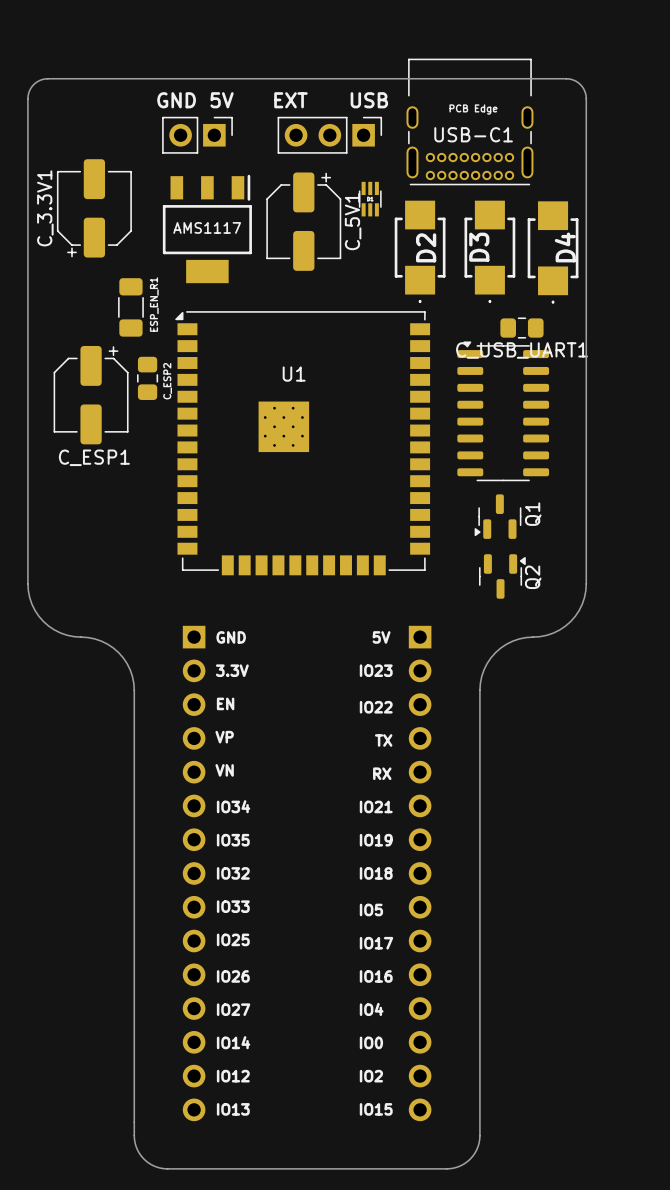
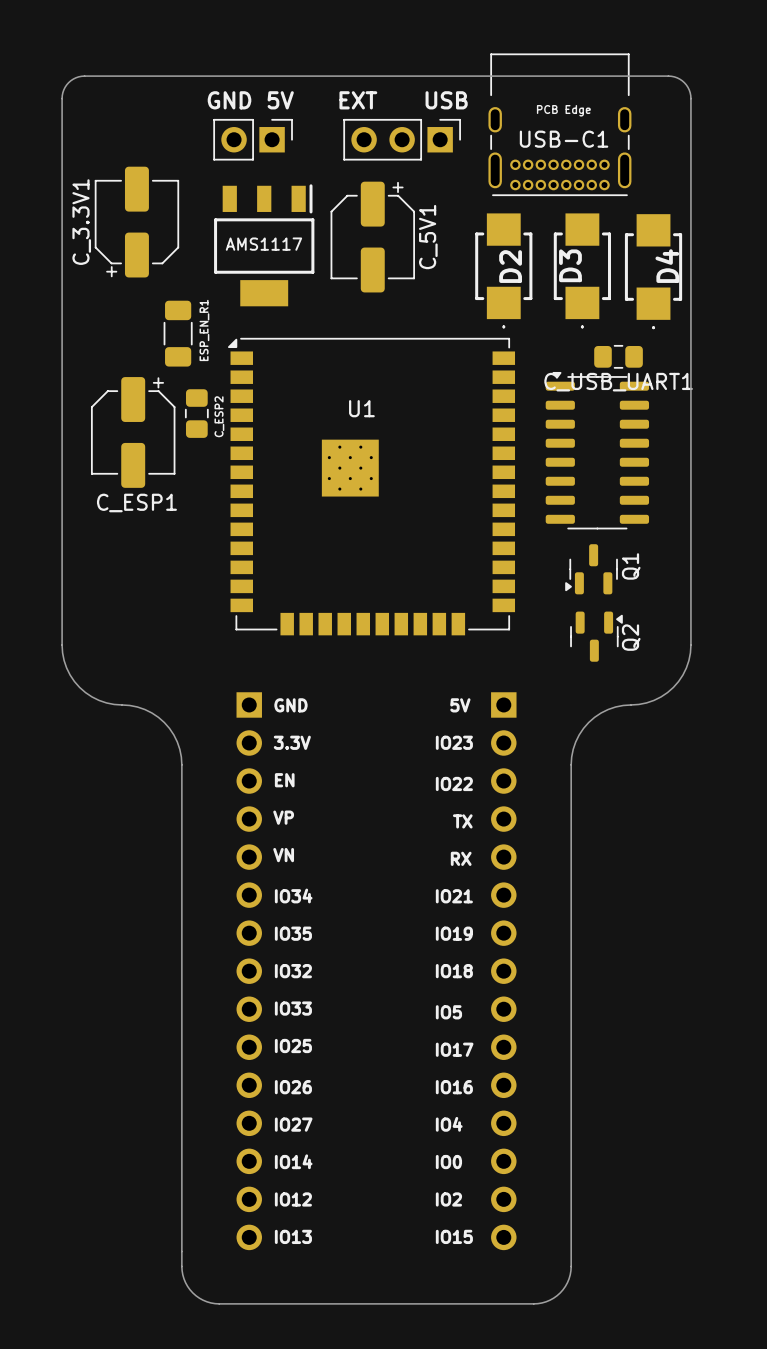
part: (370, 199) -> none

